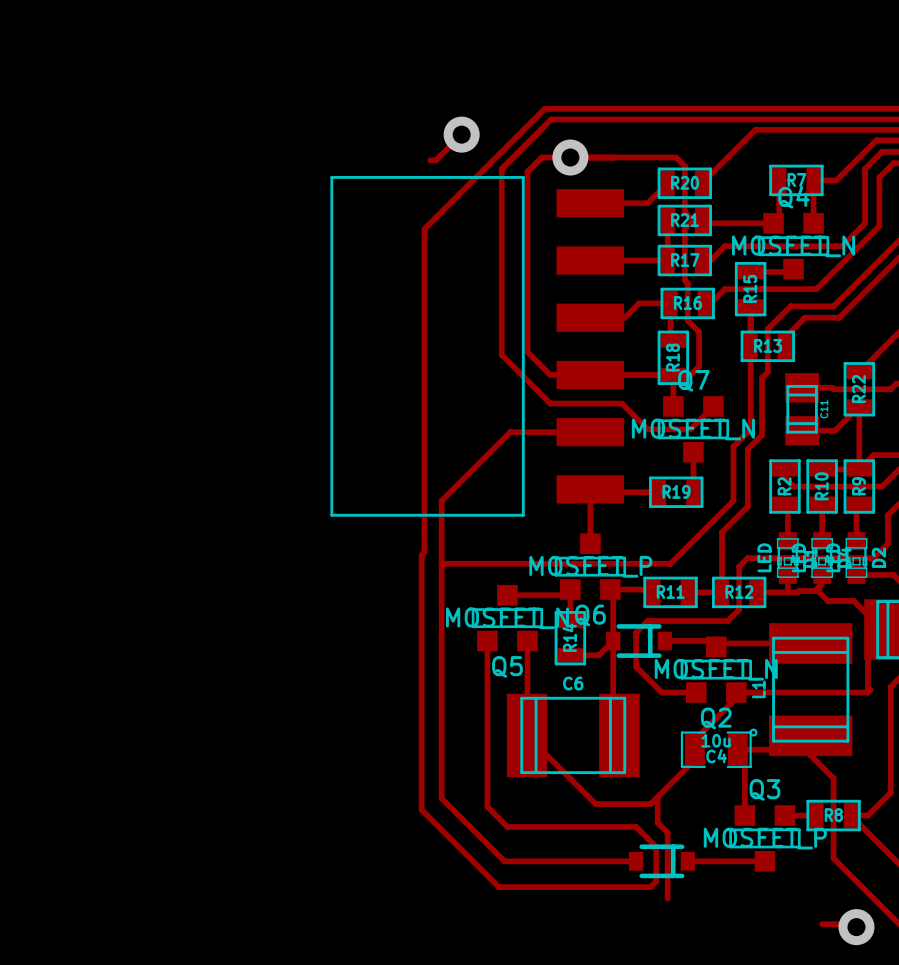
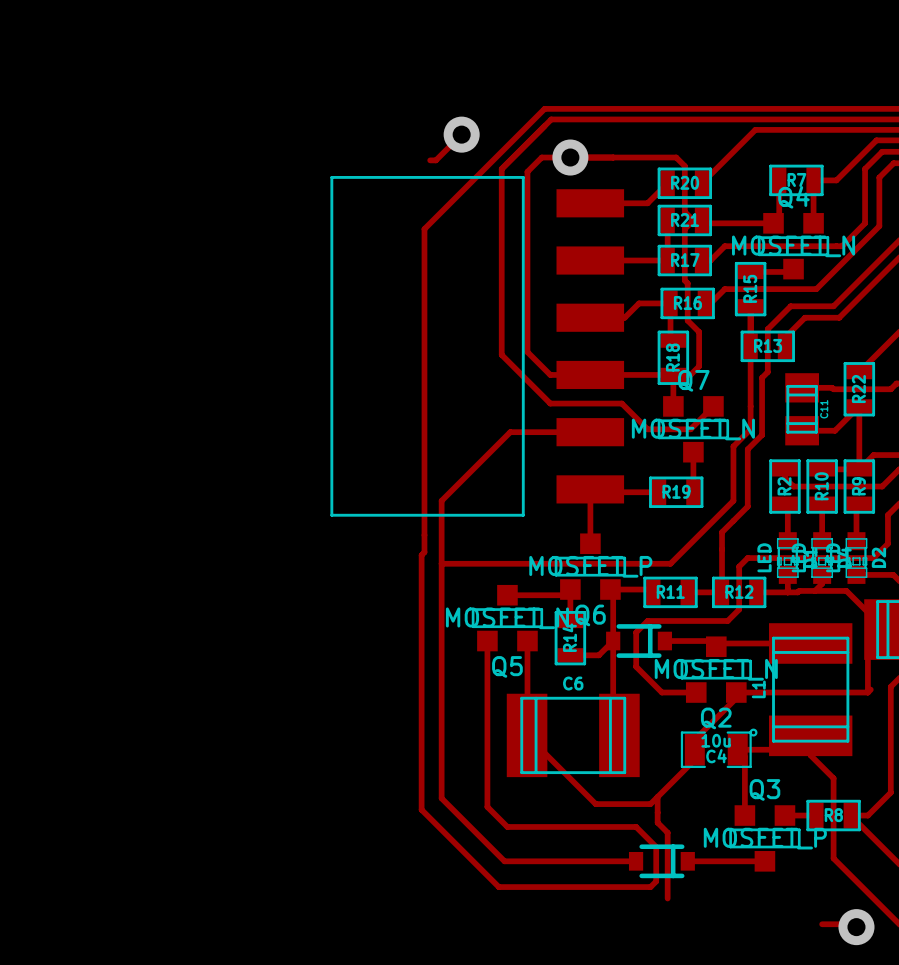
track: (819, 586) (819, 592) (827, 600) (853, 600) (882, 629) -> none
track: none -> (814, 590) (846, 590) (867, 612)

